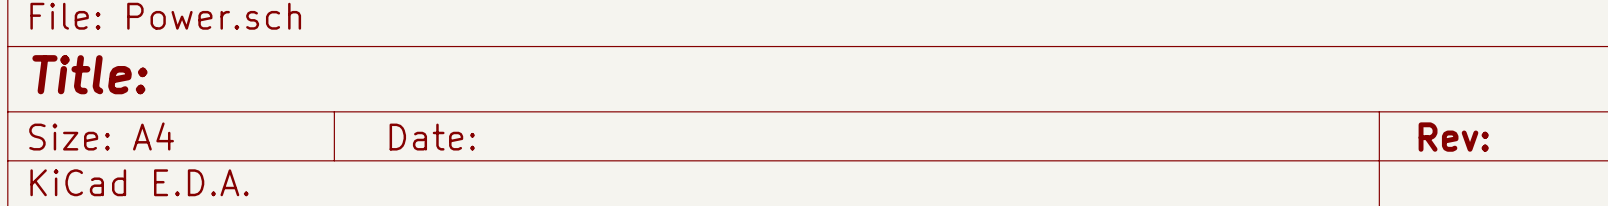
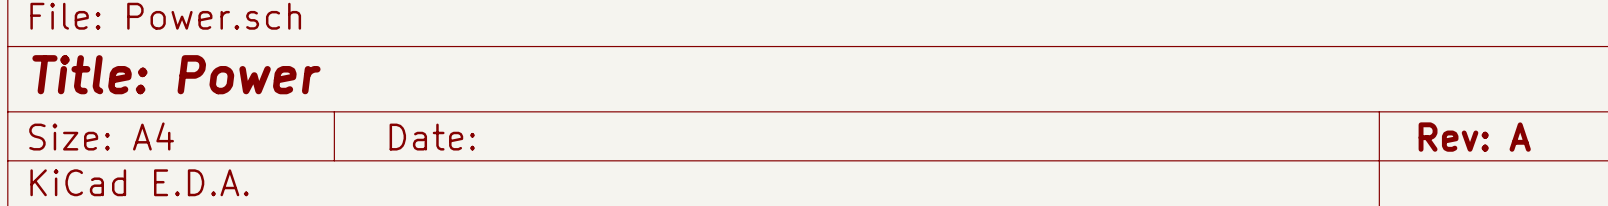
title block: Title: (89, 74) -> Title: Power (176, 74)
title block: Rev: (1453, 137) -> Rev: A (1474, 137)

